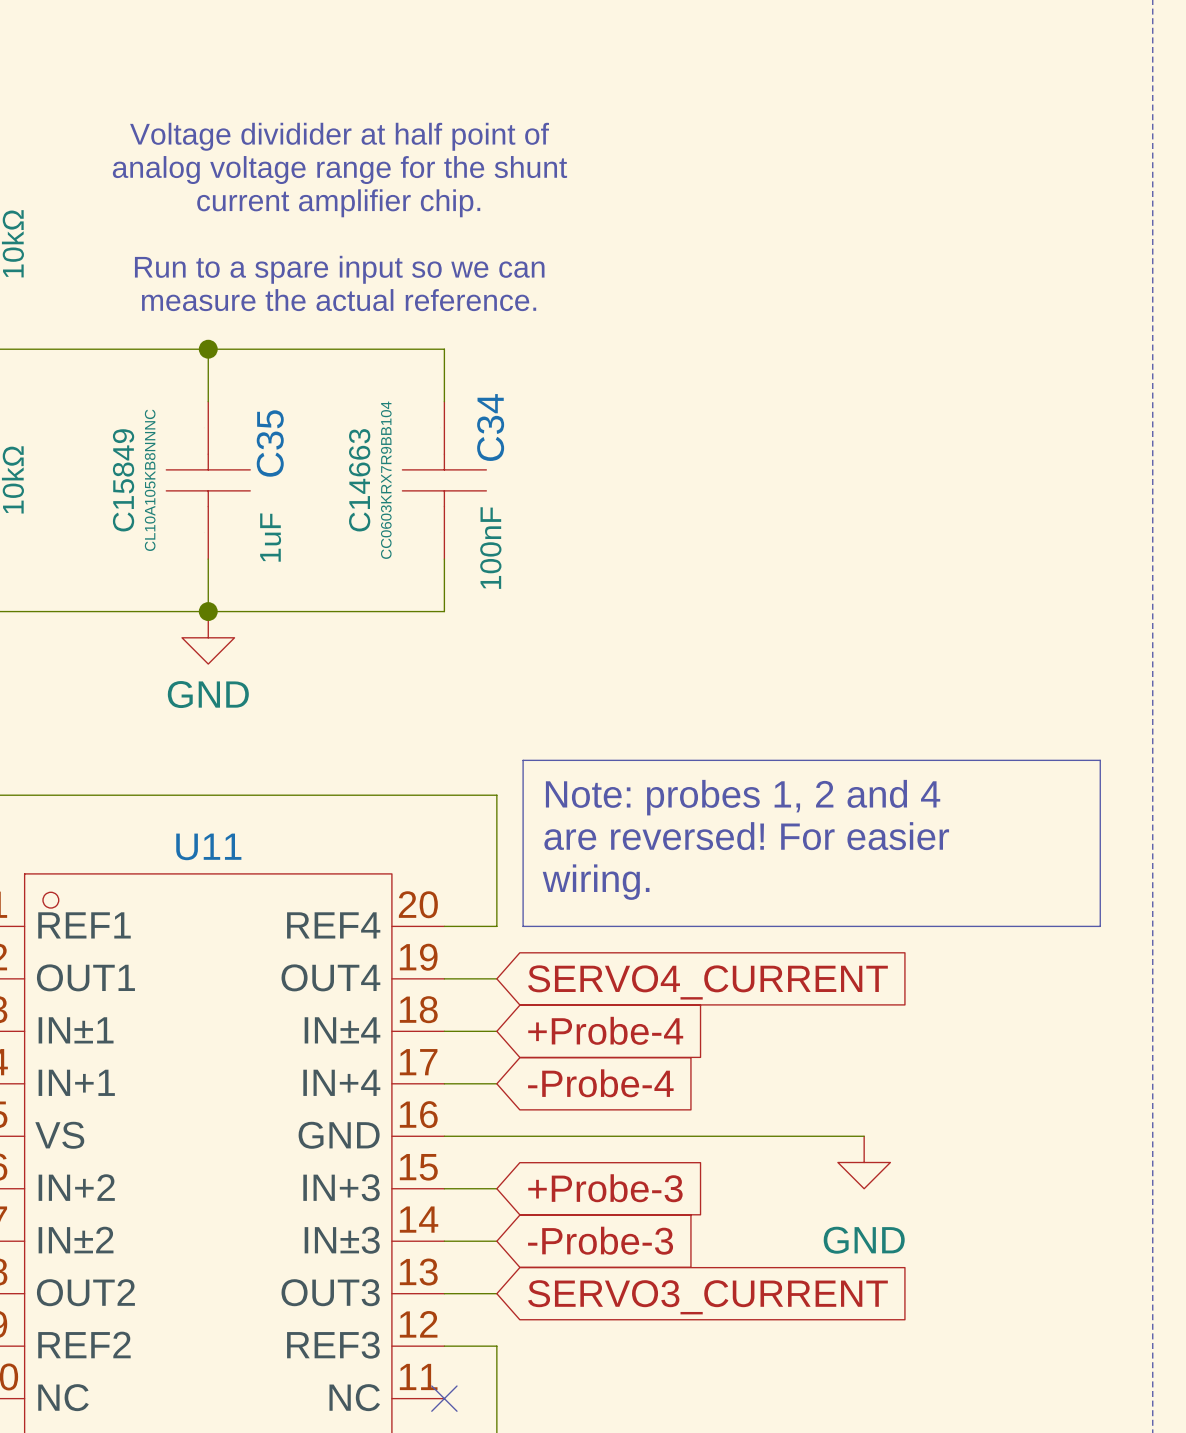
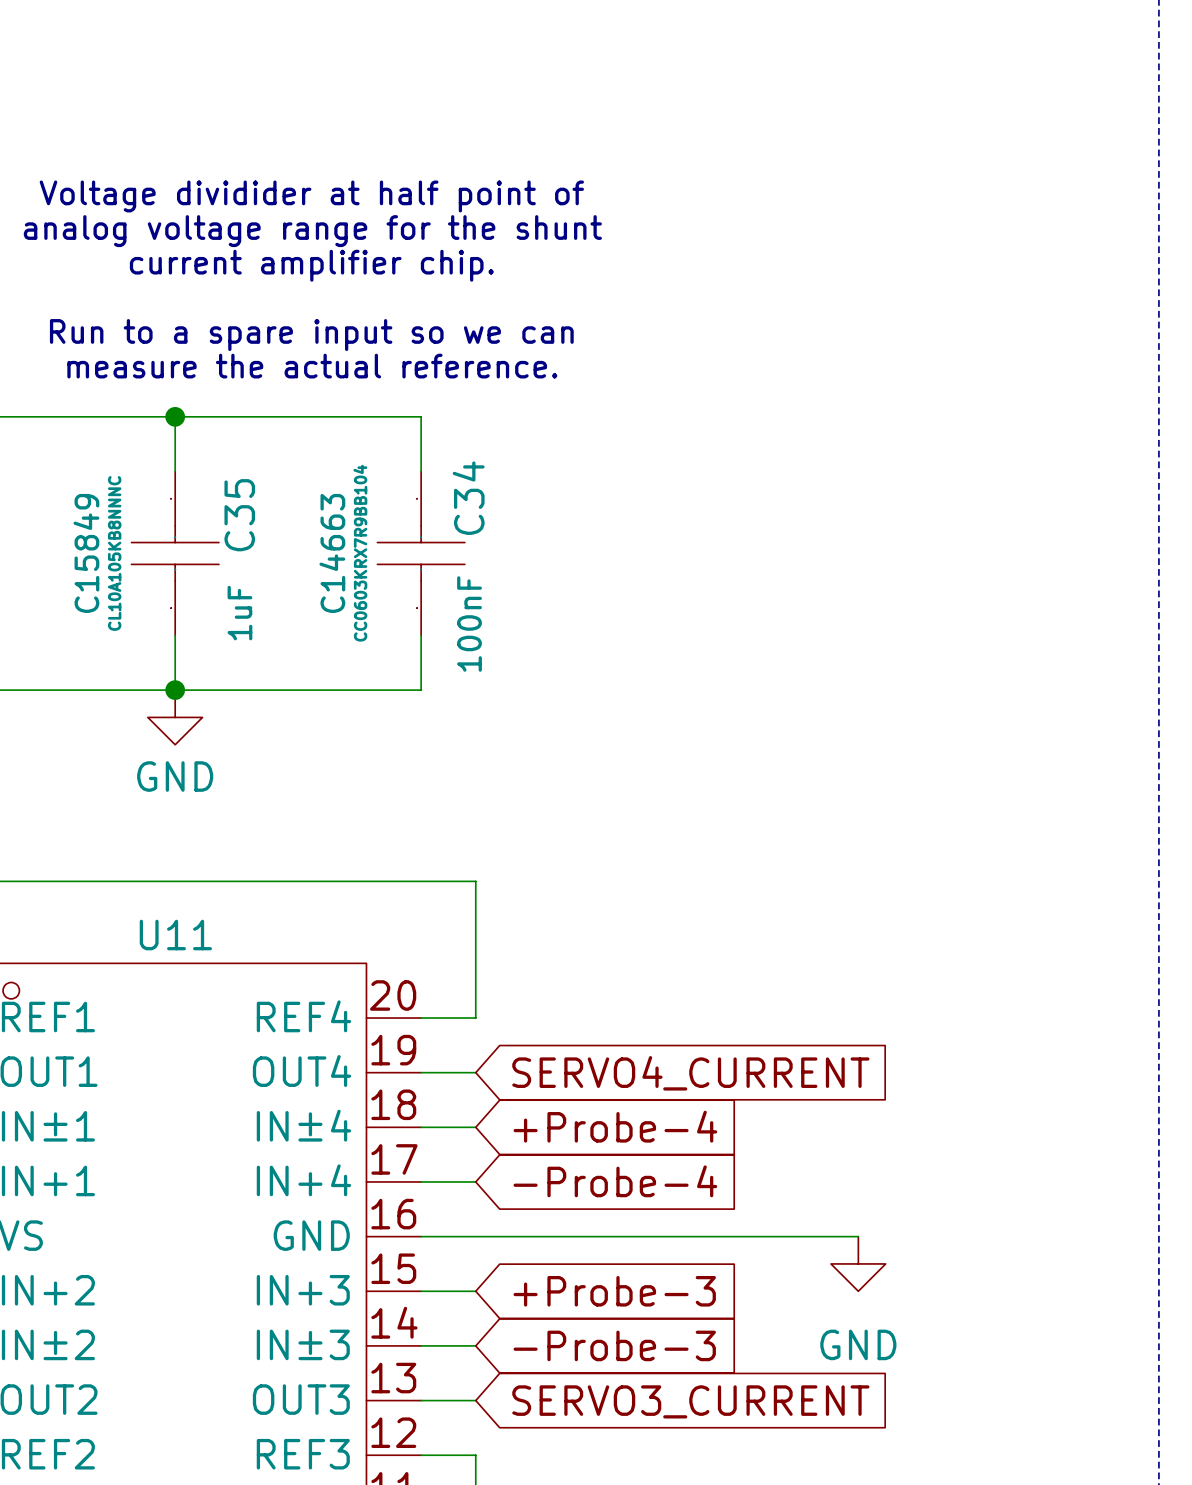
line: (523, 760) (1100, 760) (1100, 926) (523, 926) (523, 760) -> none
text: Note: probes 1, 2 and 4 (743, 797) -> none
text: are reversed! For easier (746, 836) -> none
text: wiring. (596, 882) -> none

